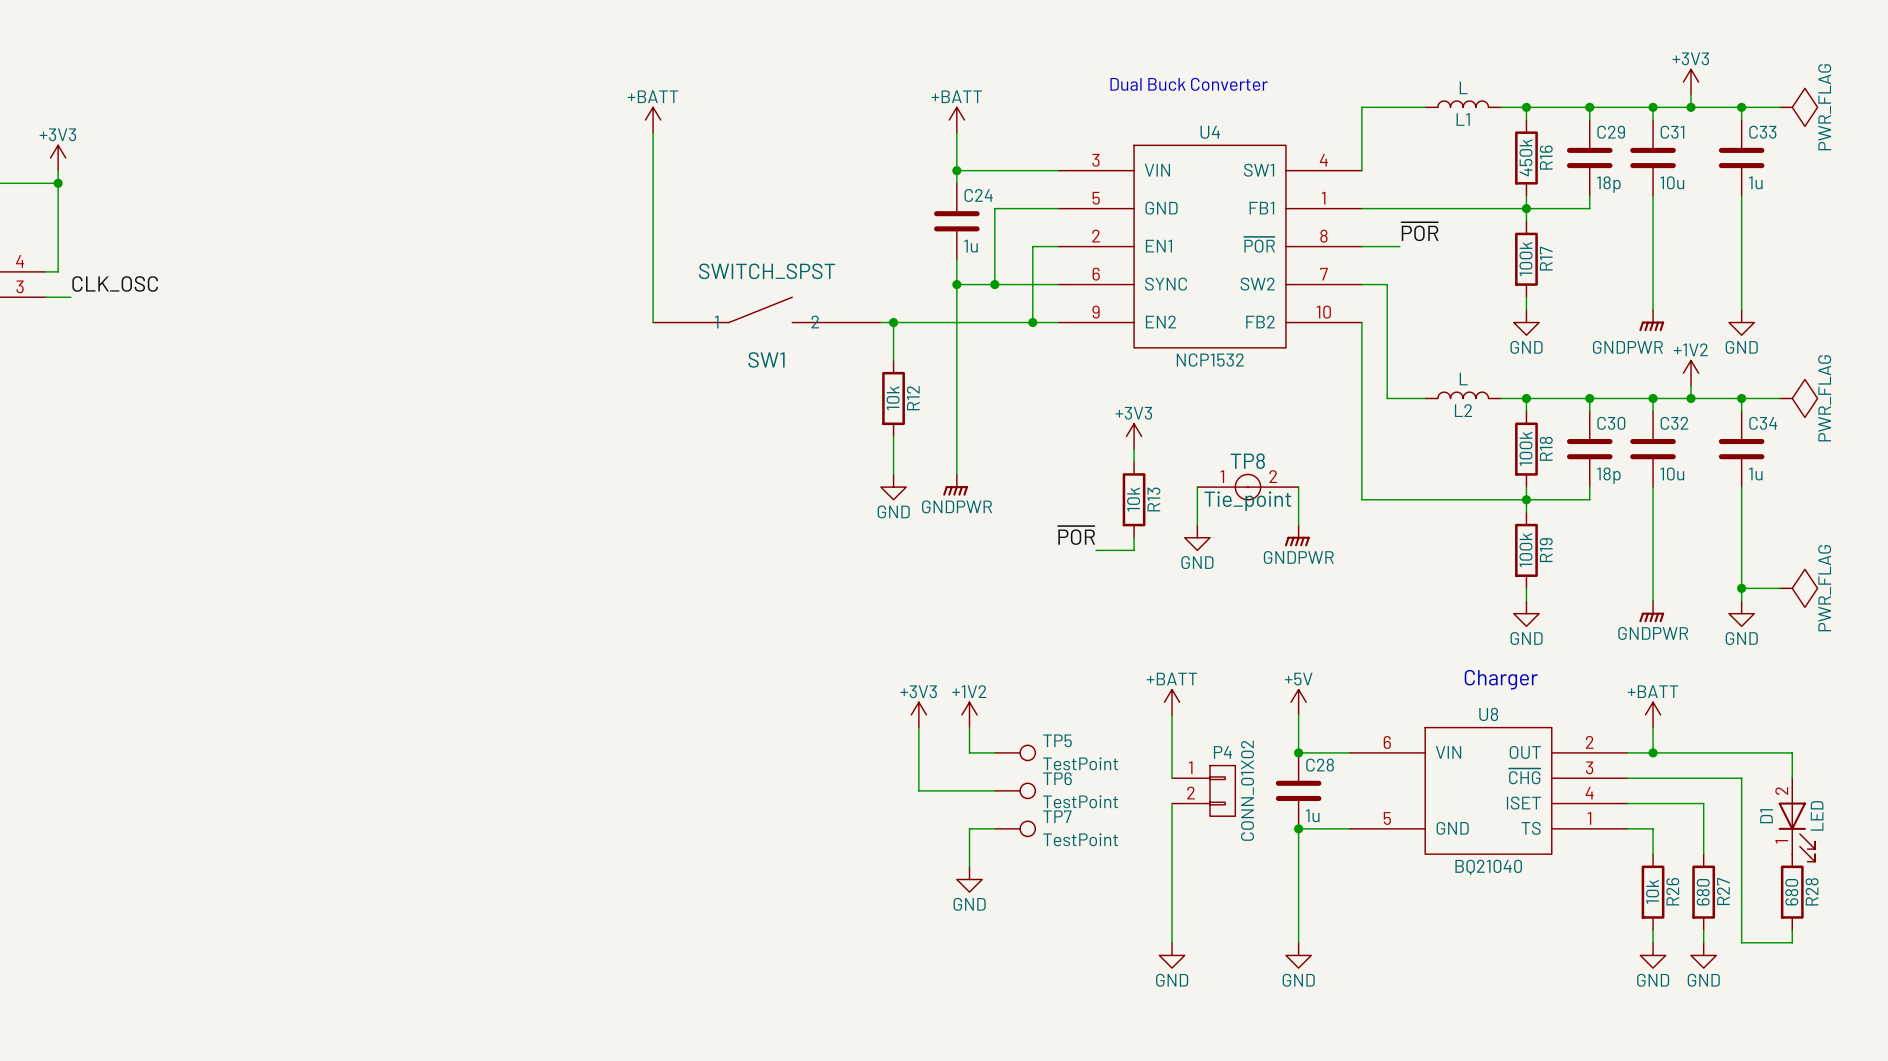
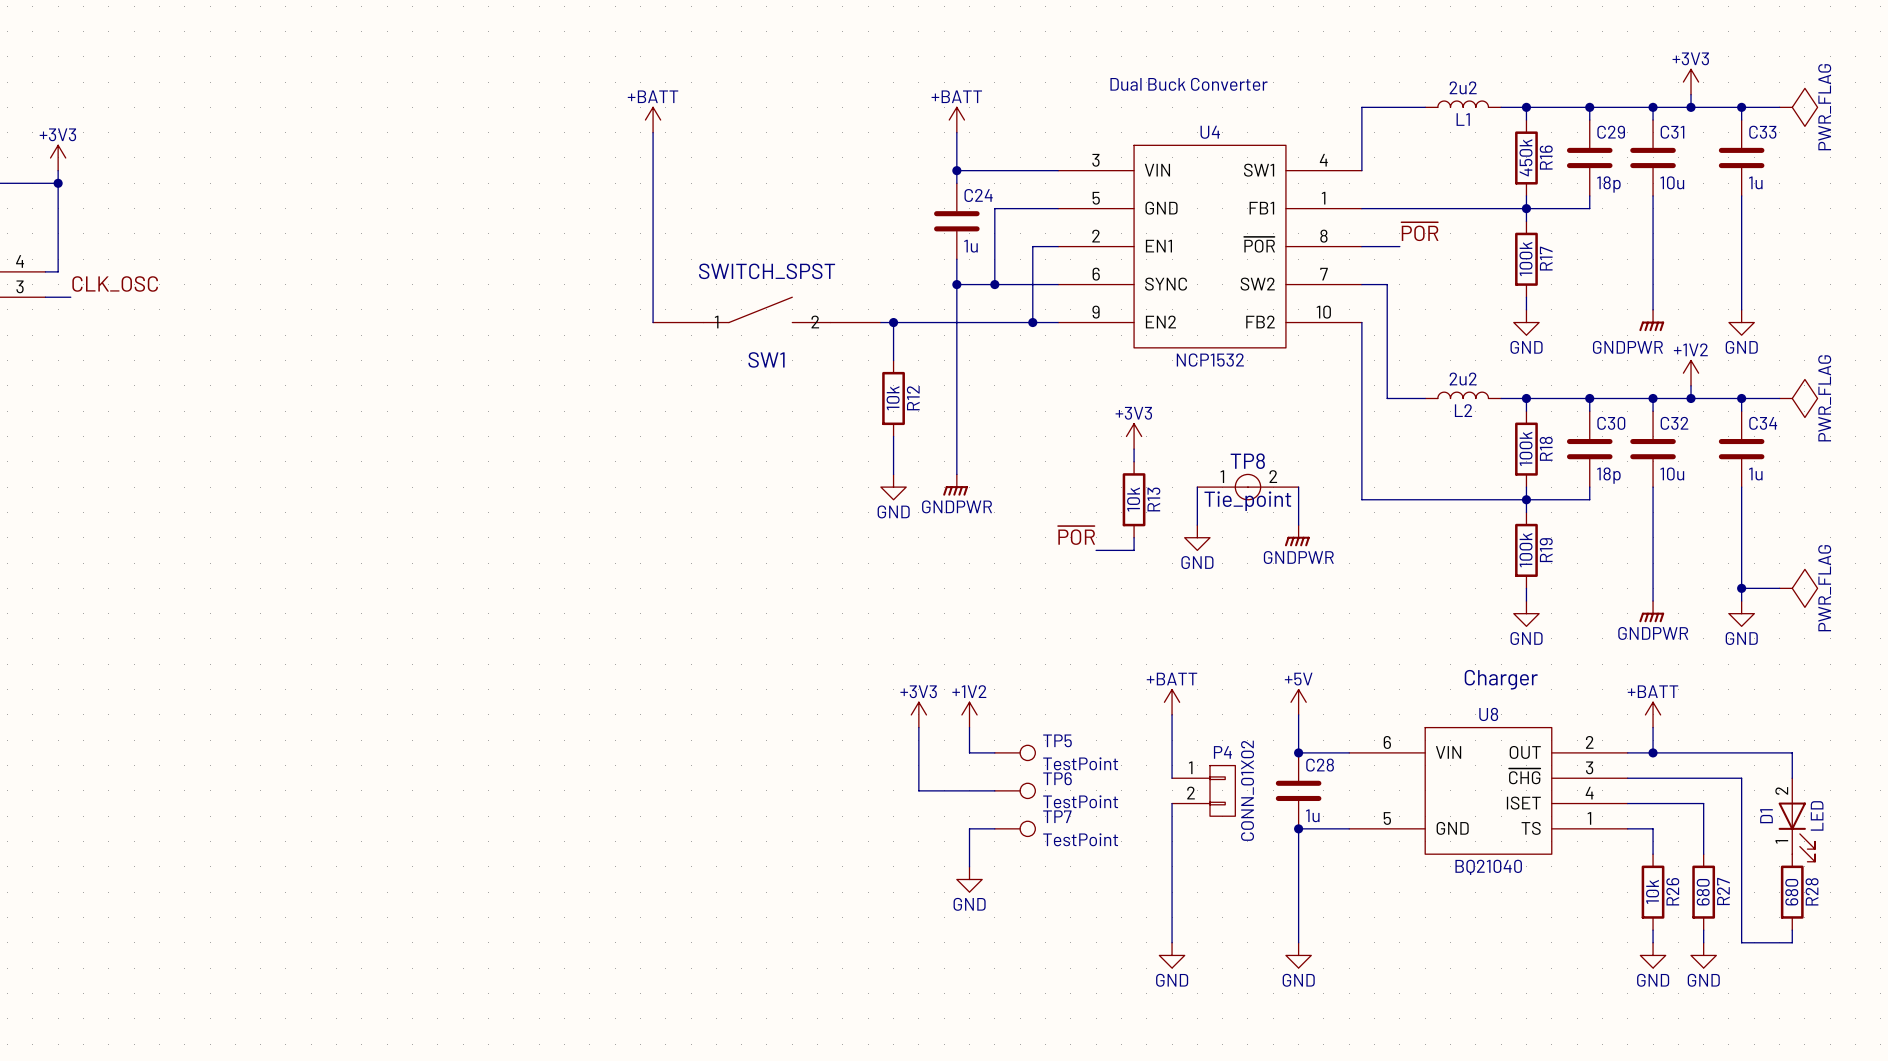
L1 value: L (1463, 87) -> 2u2 (1463, 87)
L2 value: L (1463, 379) -> 2u2 (1463, 379)

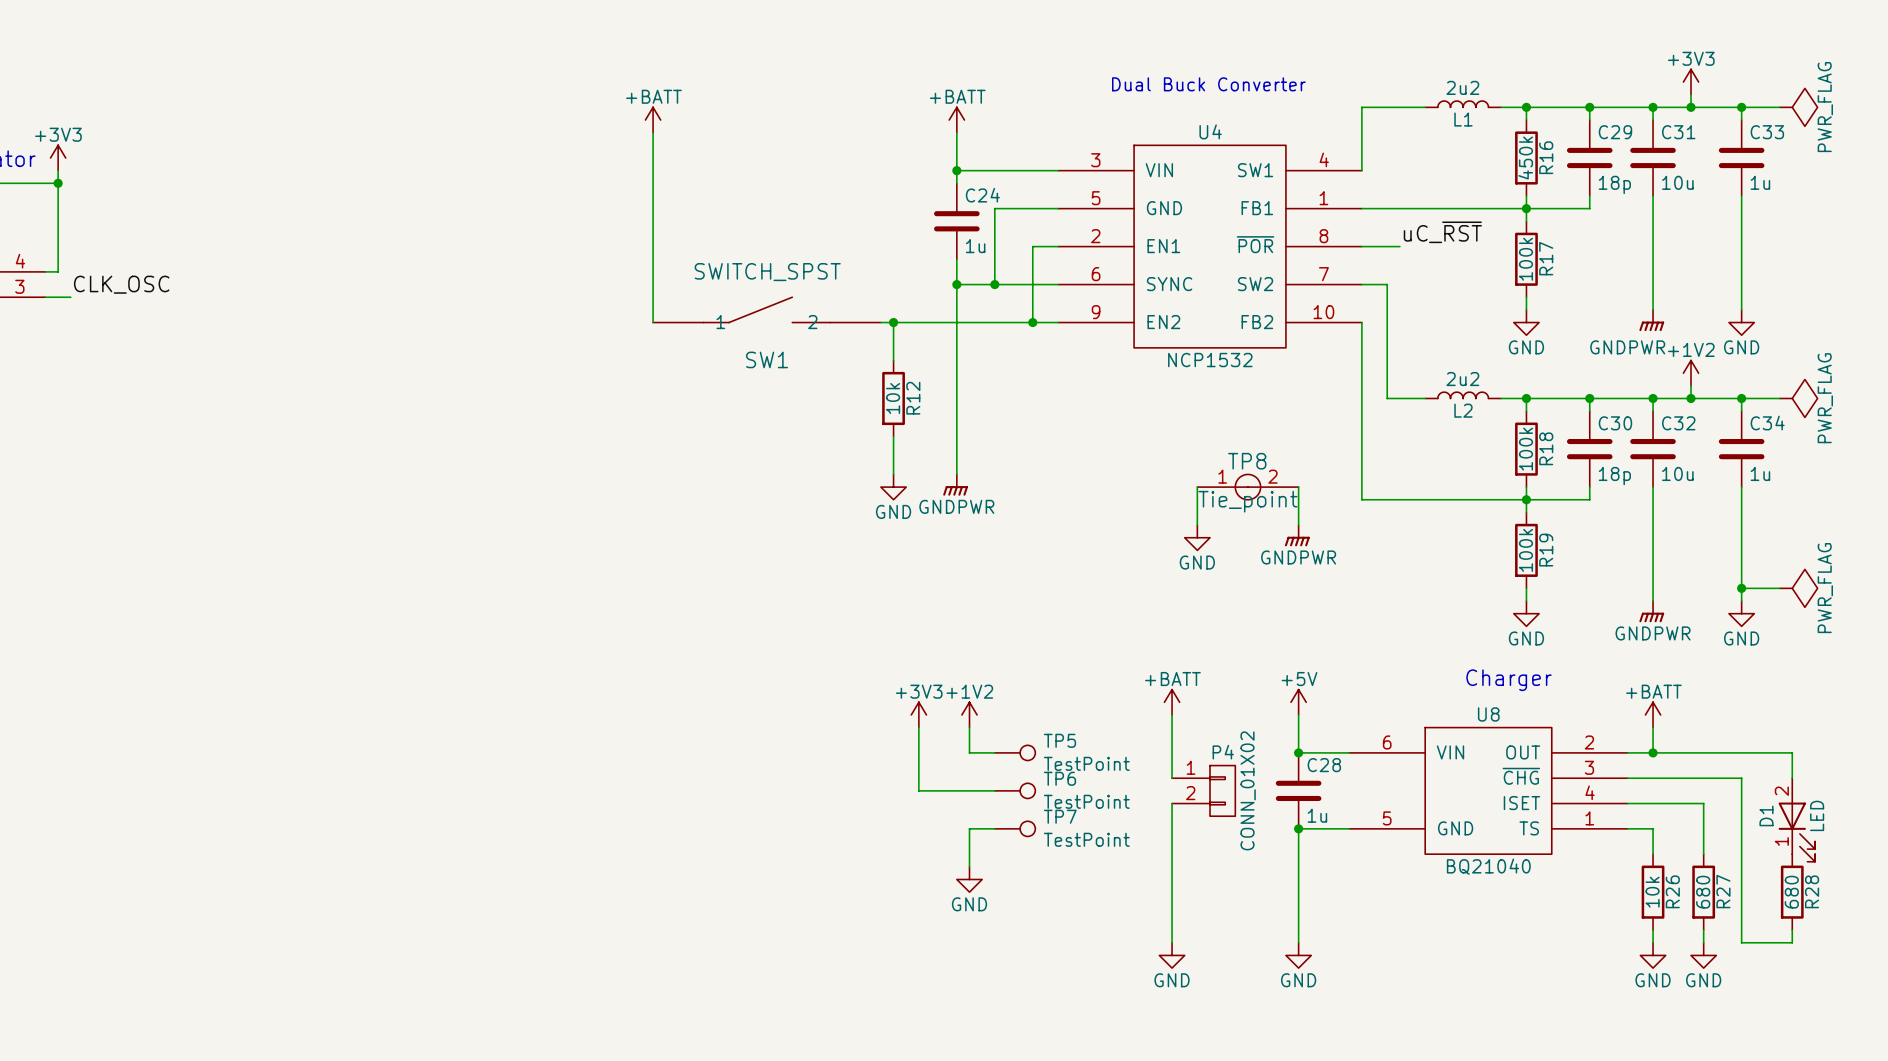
label: ~{POR} (1419, 231) -> uC_~{RST} (1442, 232)
power symbol: +3V3 (1134, 436) -> none
wire: (1134, 449) (1134, 461) -> none
R13: 10k (1134, 499) -> none
label: ~{POR} (1076, 535) -> none
wire: (1134, 537) (1134, 550) (1096, 550) -> none

